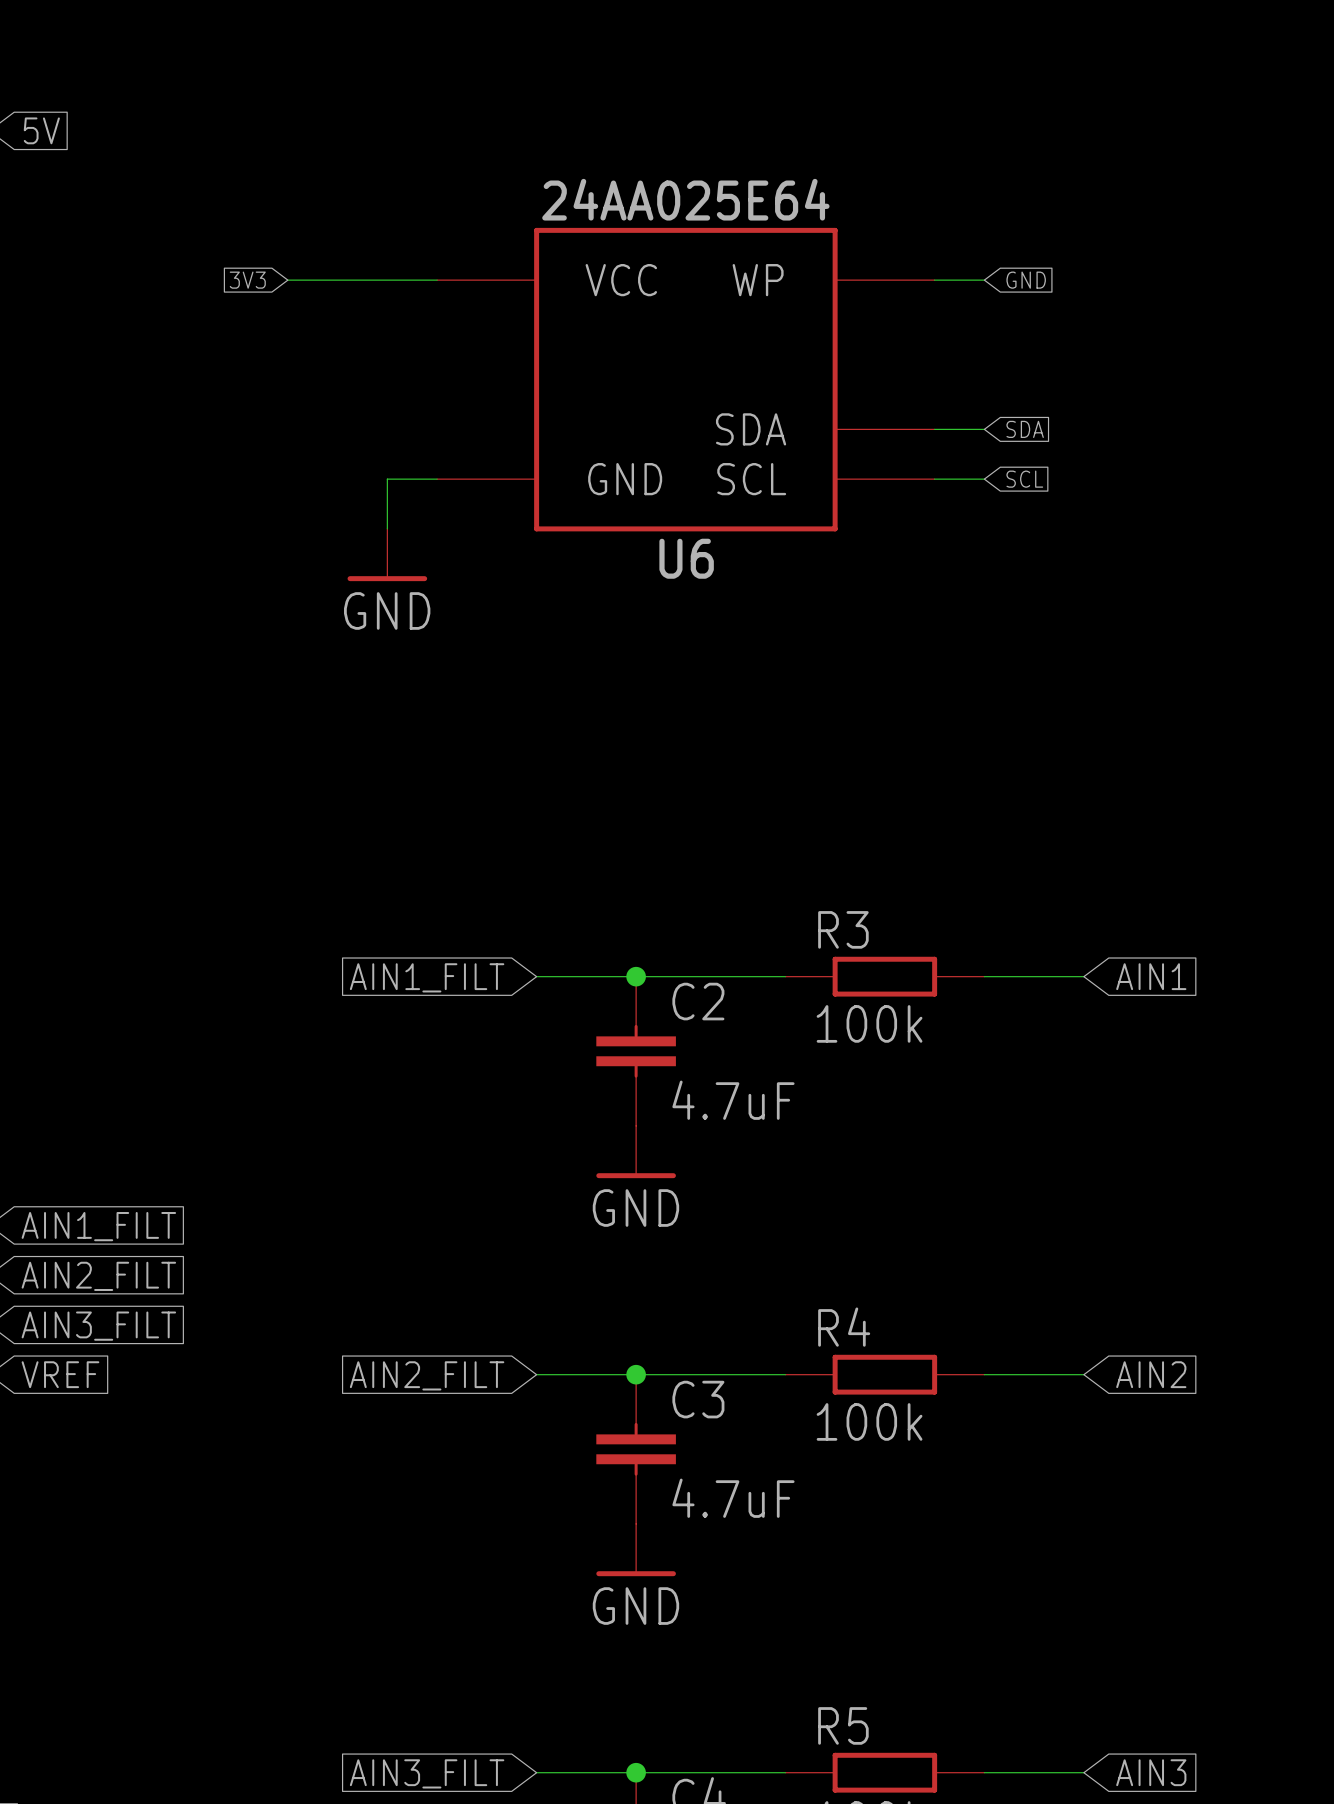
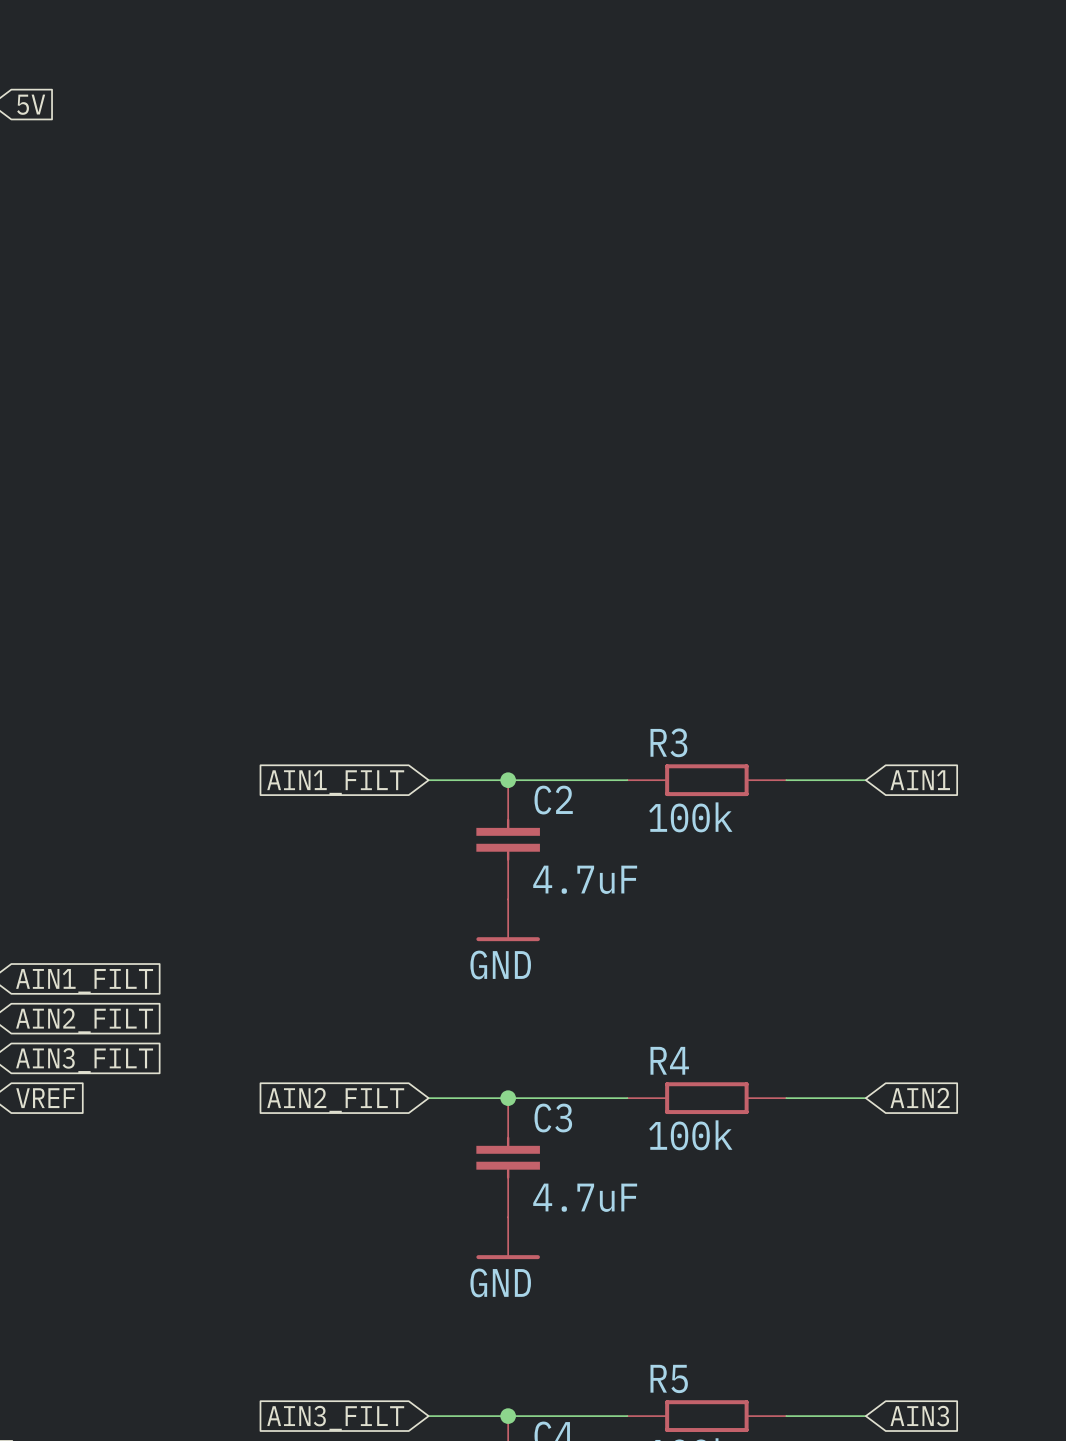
global label: 3V3 (247, 280) -> none
wire: (287, 280) (437, 280) -> none
wire: (934, 280) (984, 280) -> none
global label: GND (1026, 280) -> none
U6: (685, 379) -> none
wire: (934, 429) (984, 429) -> none
global label: SDA (1025, 429) -> none
wire: (437, 479) (387, 479) (387, 528) -> none
wire: (934, 479) (984, 479) -> none
global label: SCL (1024, 479) -> none
power symbol: GND (387, 555) -> none

